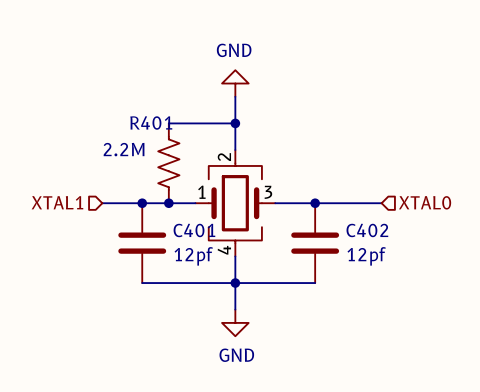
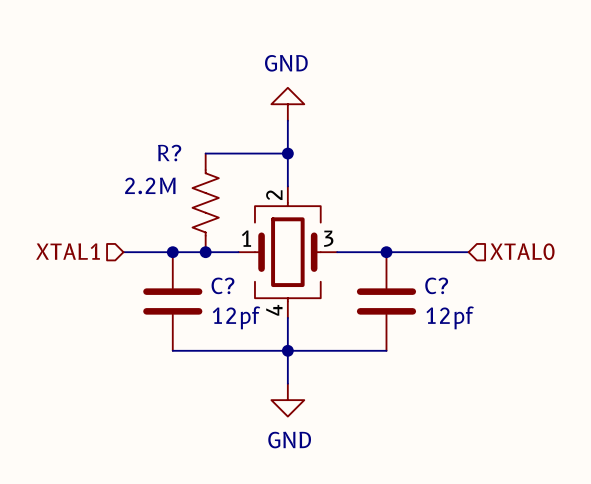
R401 name: R401 (151, 123) -> R? (169, 153)
C401 name: C401 (194, 230) -> C? (222, 285)
C402 name: C402 (367, 230) -> C? (436, 285)

